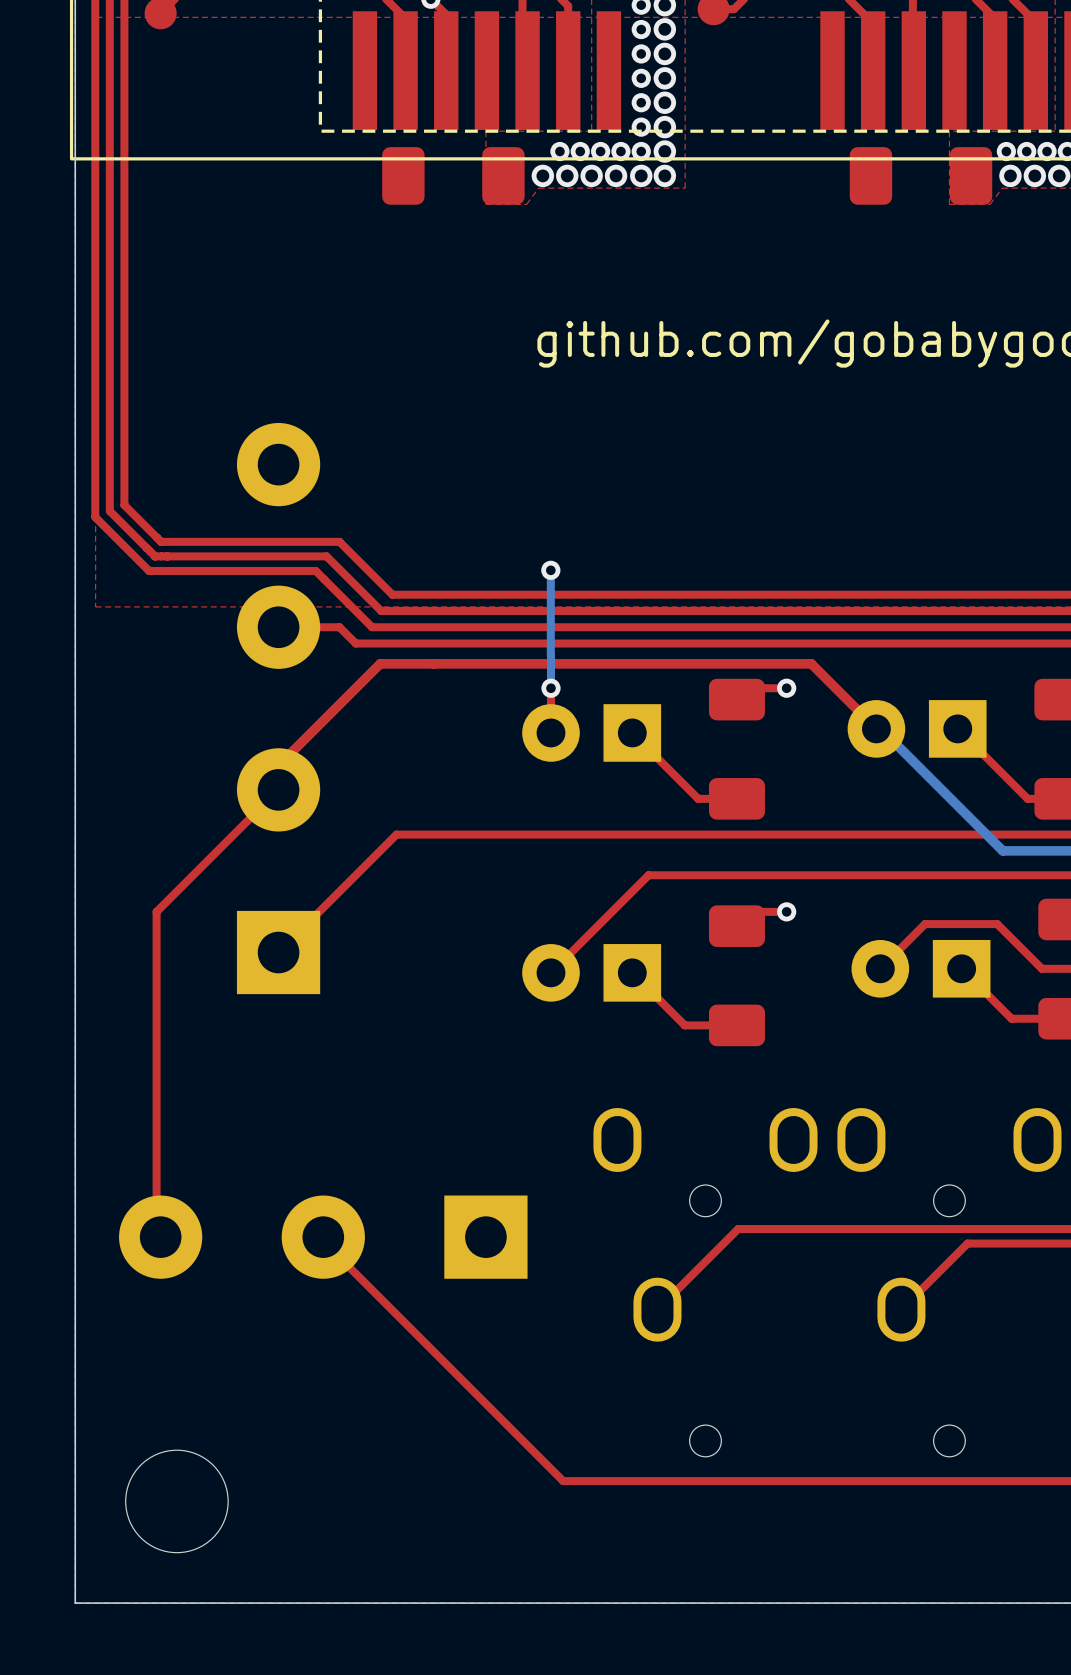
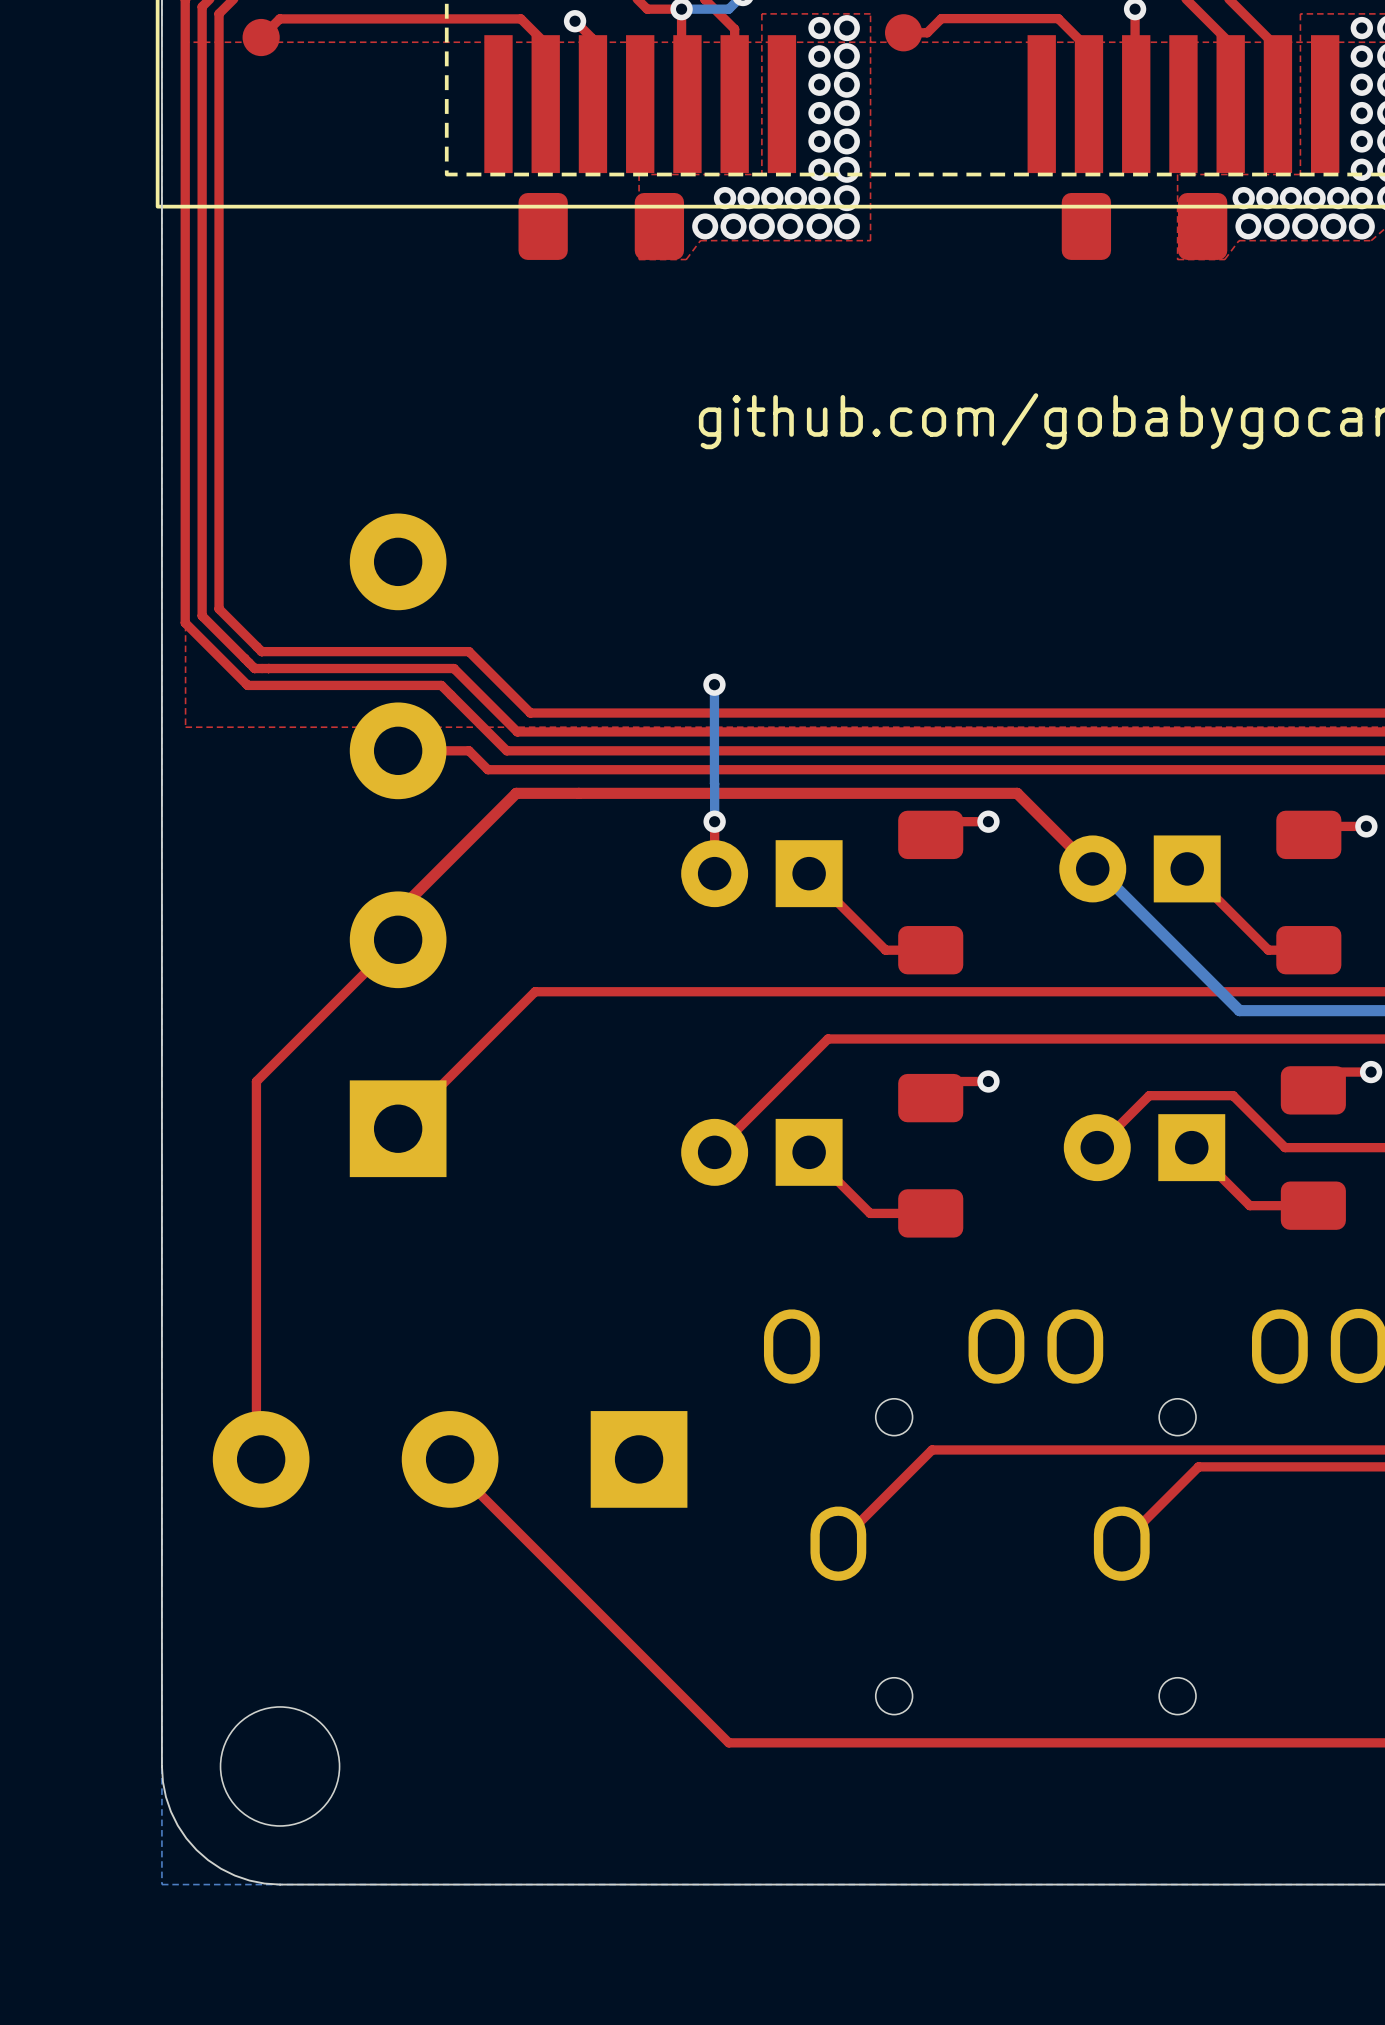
board edge: (75, 1501) (75, 1603) (176, 1603) -> (161, 1766) (162, 1781) (170, 1811) (186, 1838) (196, 1849) (208, 1860) (234, 1875) (249, 1880) (280, 1884)

